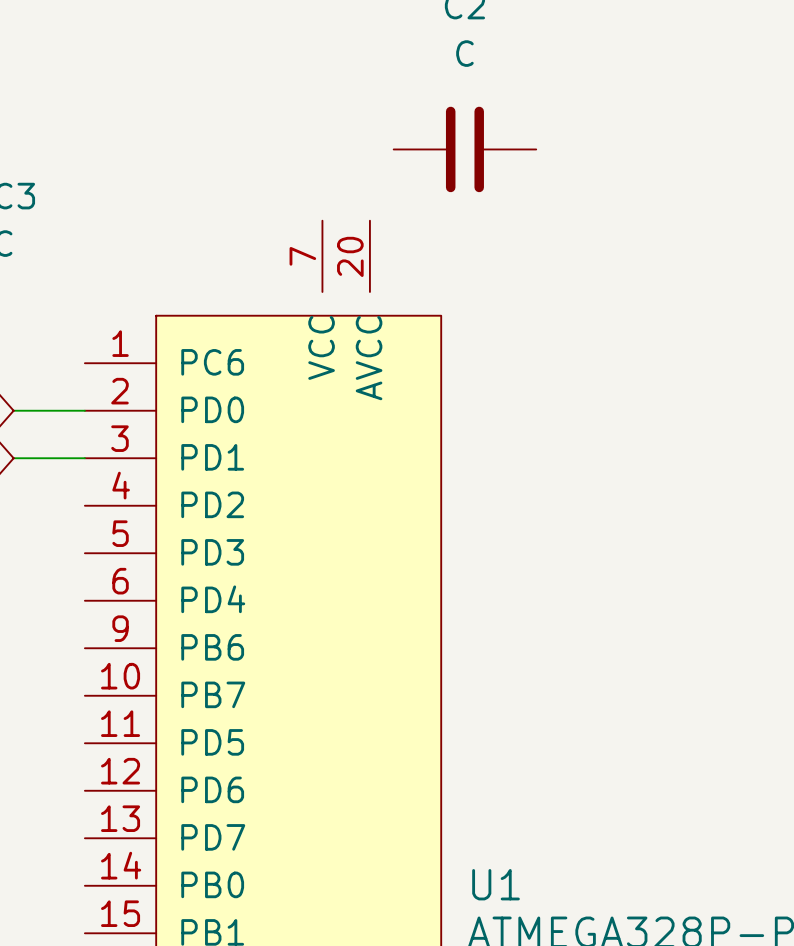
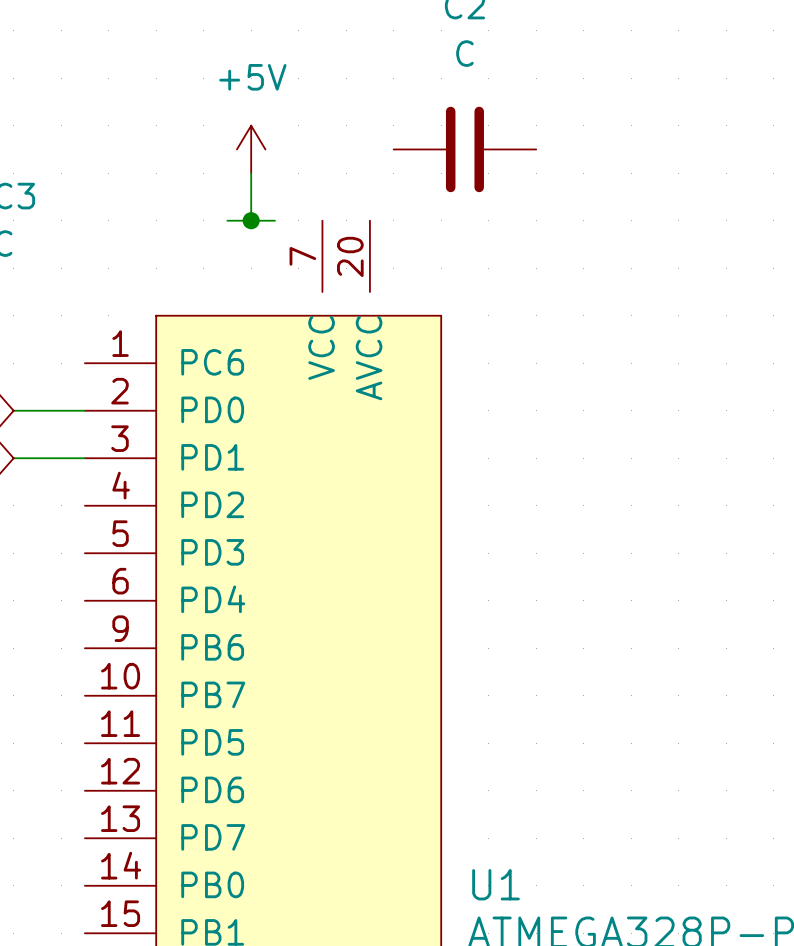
power symbol: none -> +5V (251, 149)
wire: none -> (251, 173) (251, 220)
wire: none -> (227, 220) (274, 220)
junction: none -> (251, 220)

